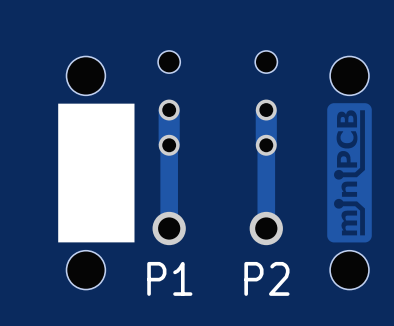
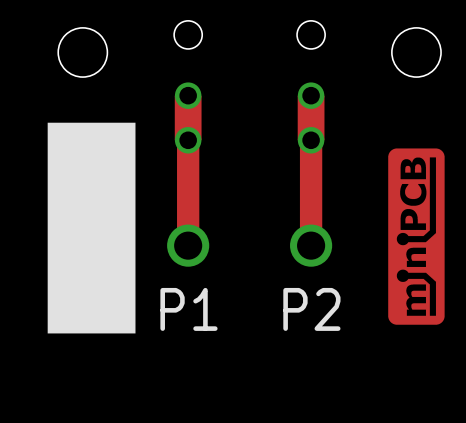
drawing: [58, 103, 135, 243] -> none
drawing: [327, 103, 372, 243] -> none
drawing: none -> [47, 122, 136, 334]
drawing: none -> [388, 148, 445, 325]
hole: (85, 270) -> none
hole: (349, 270) -> none

